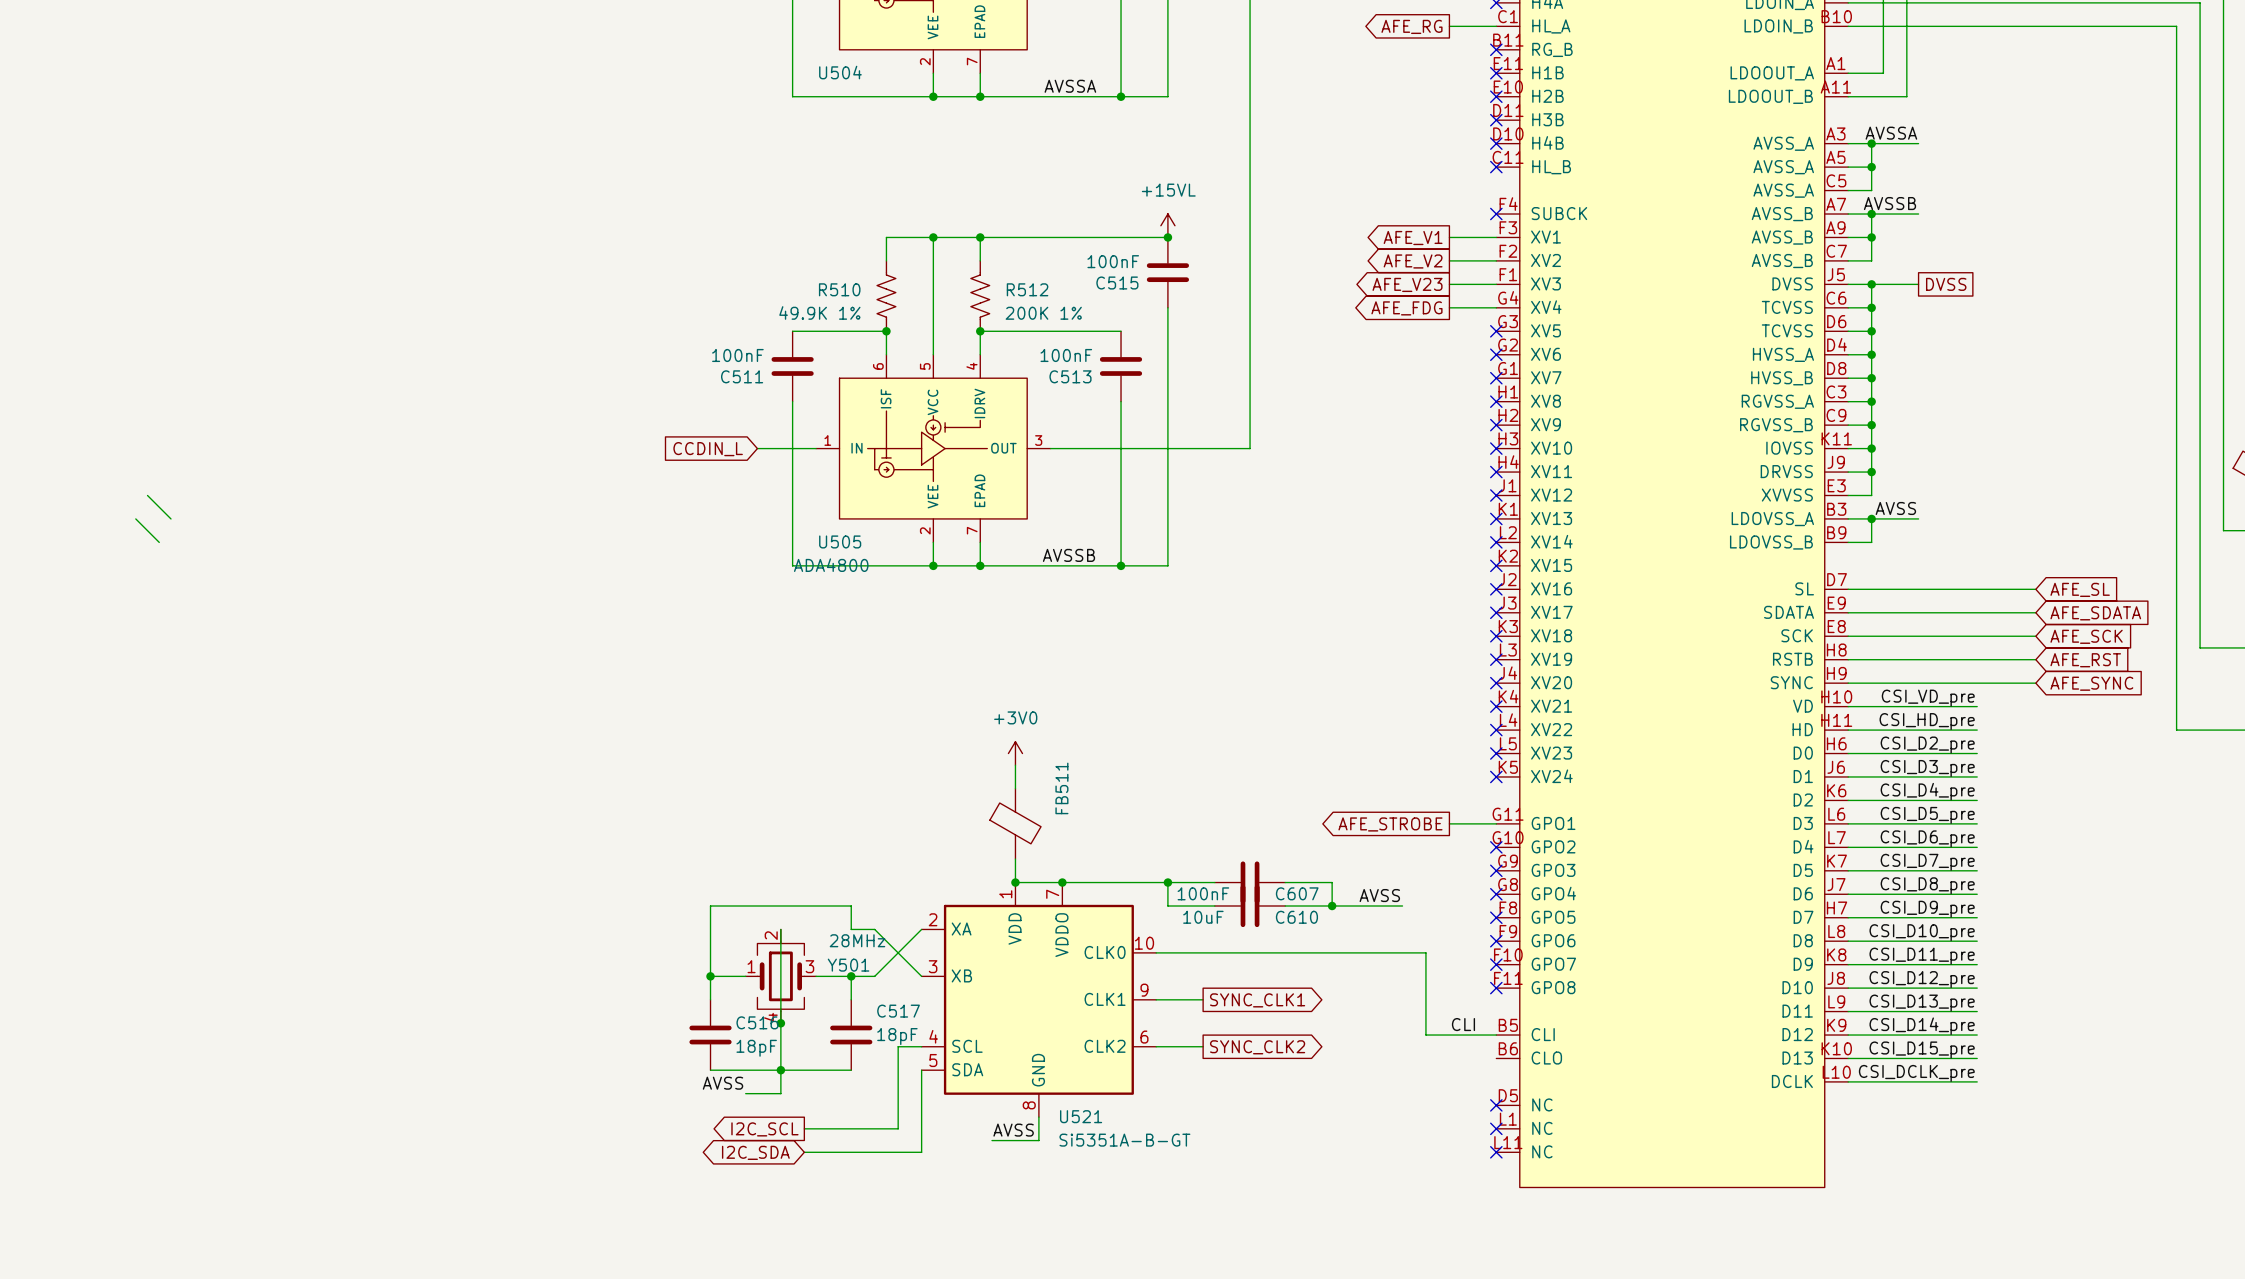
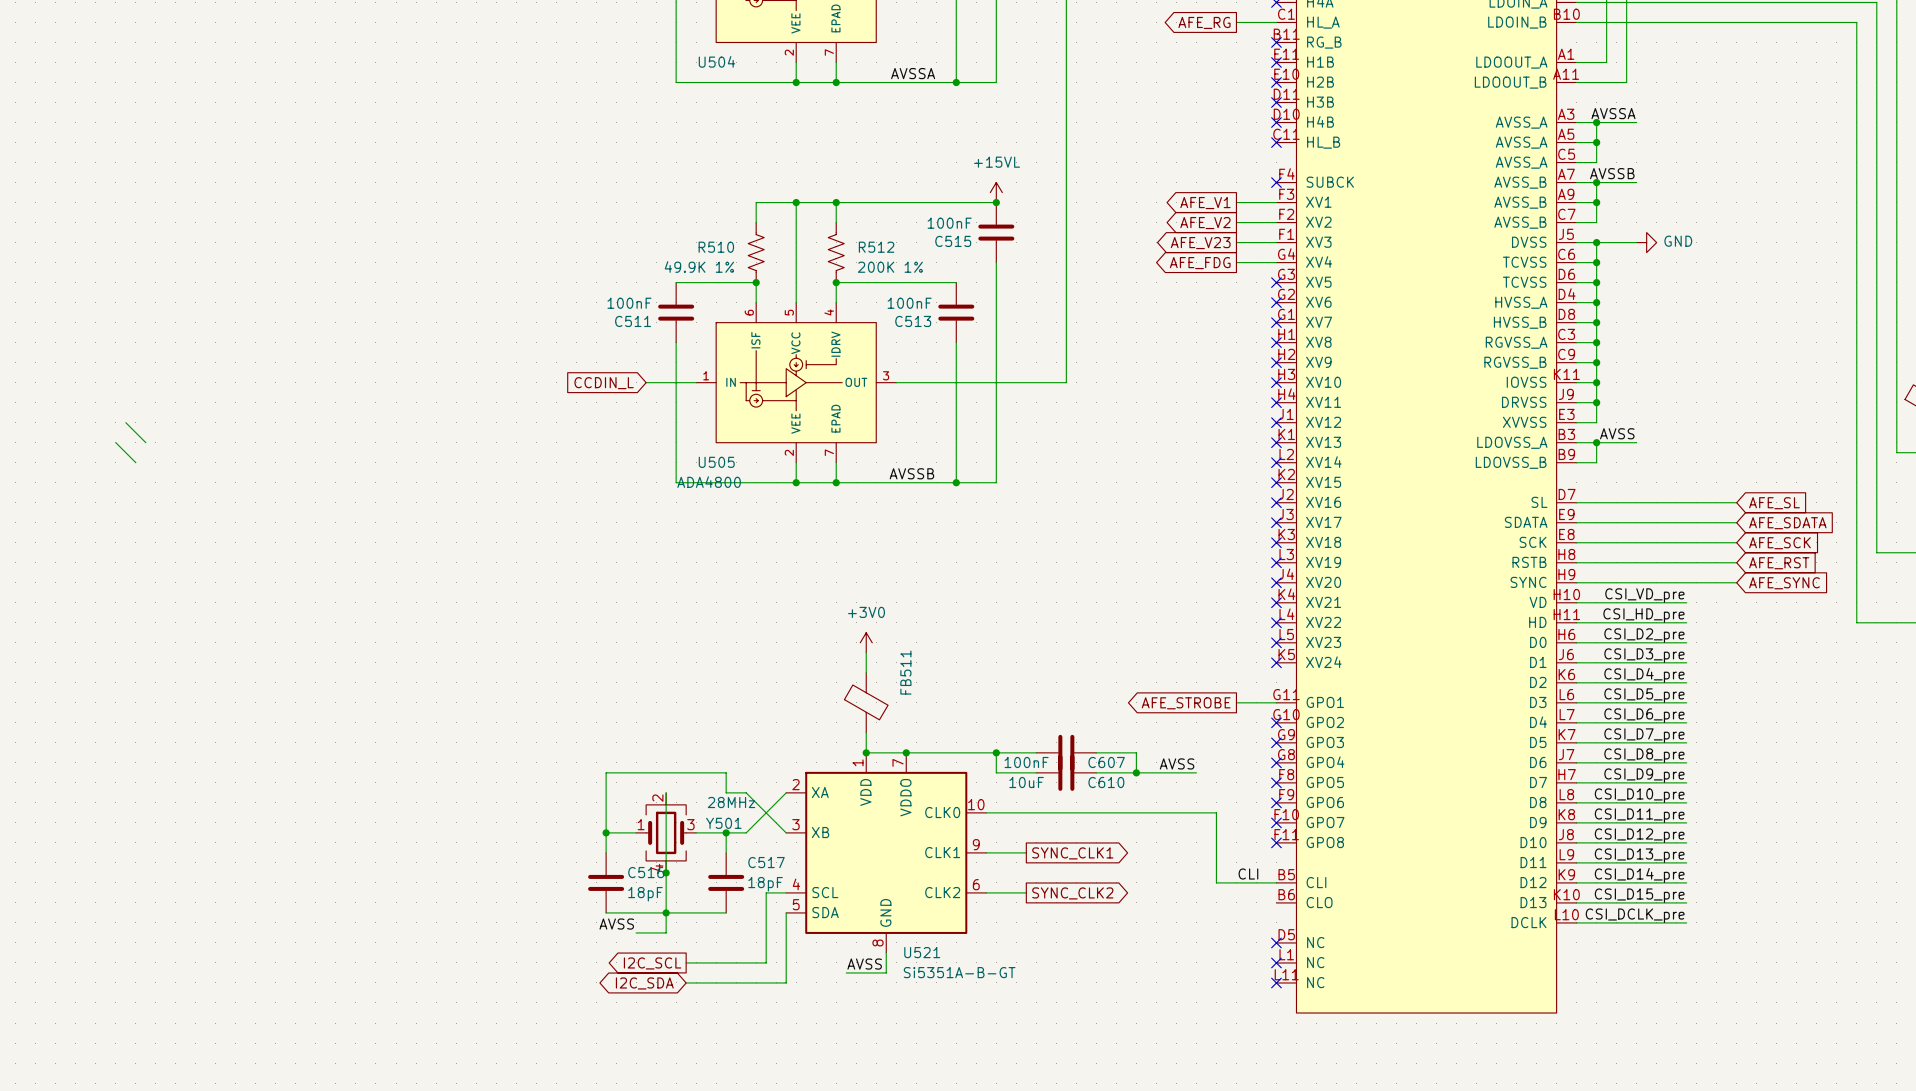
power symbol: none -> GND (1646, 242)
global label: DVSS (1946, 284) -> none

